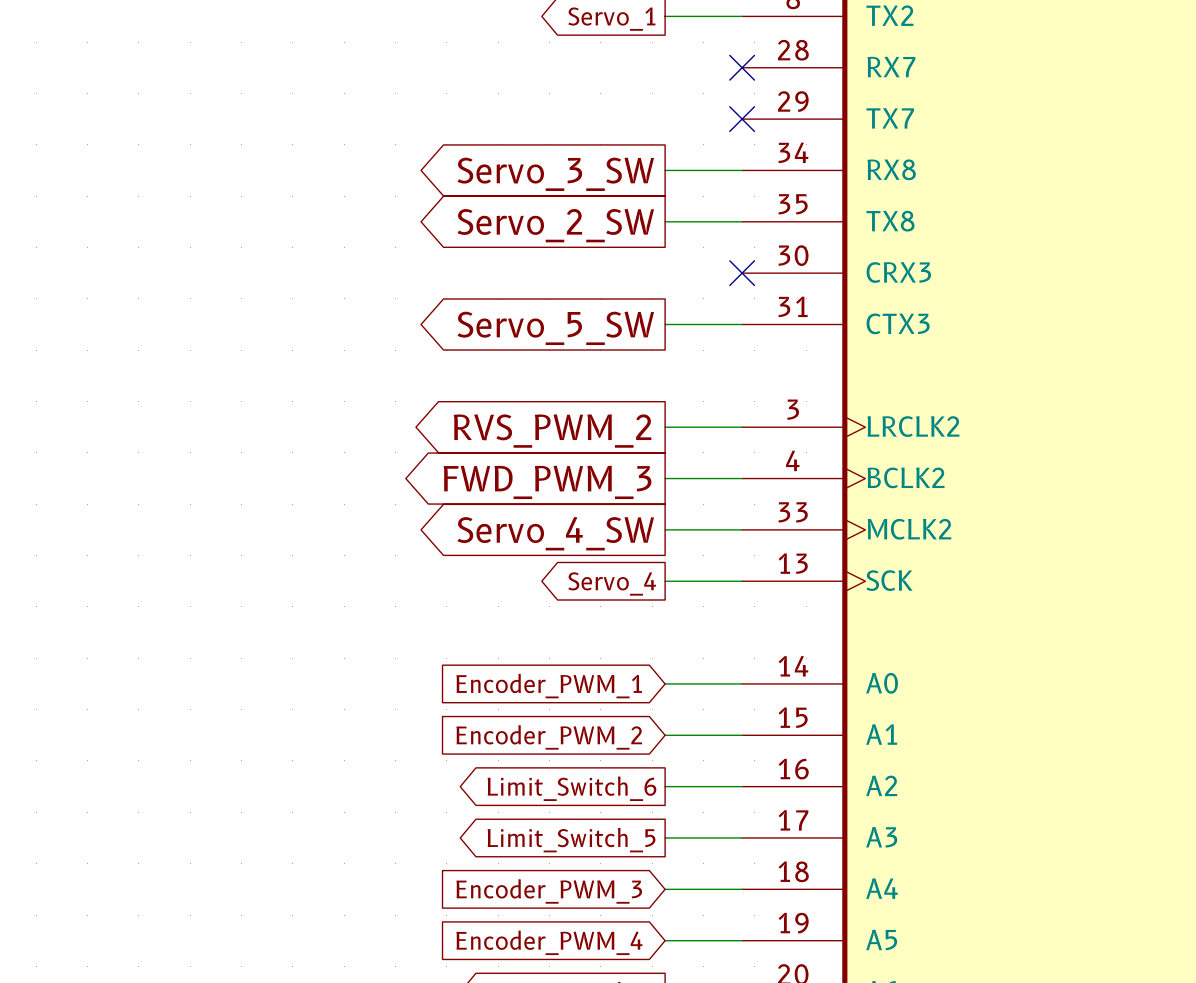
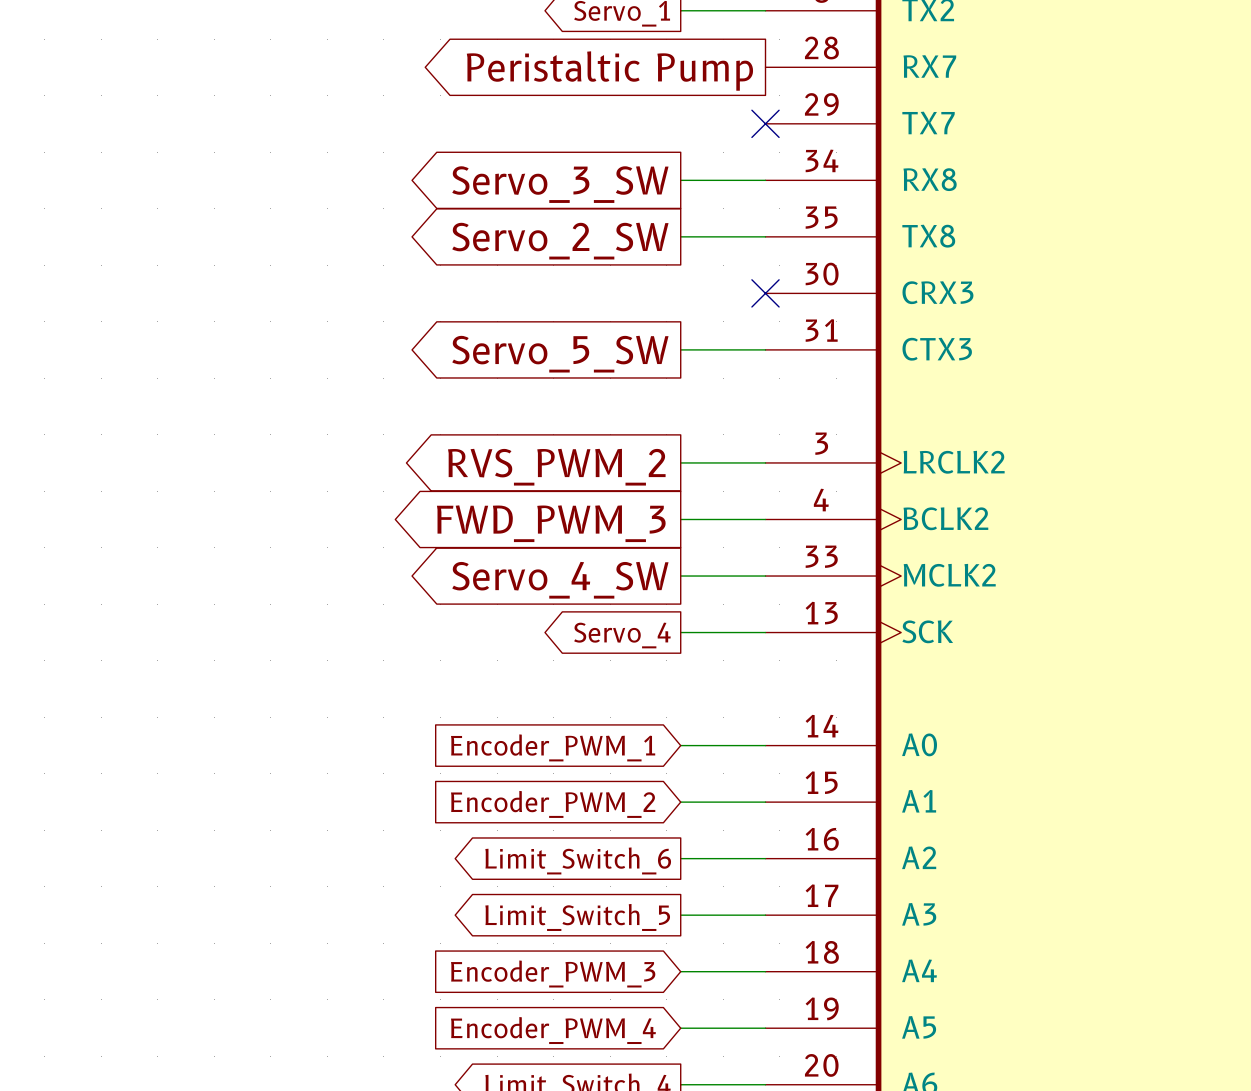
no-connect mark: (742, 67) -> none
global label: none -> Peristaltic Pump (609, 71)

